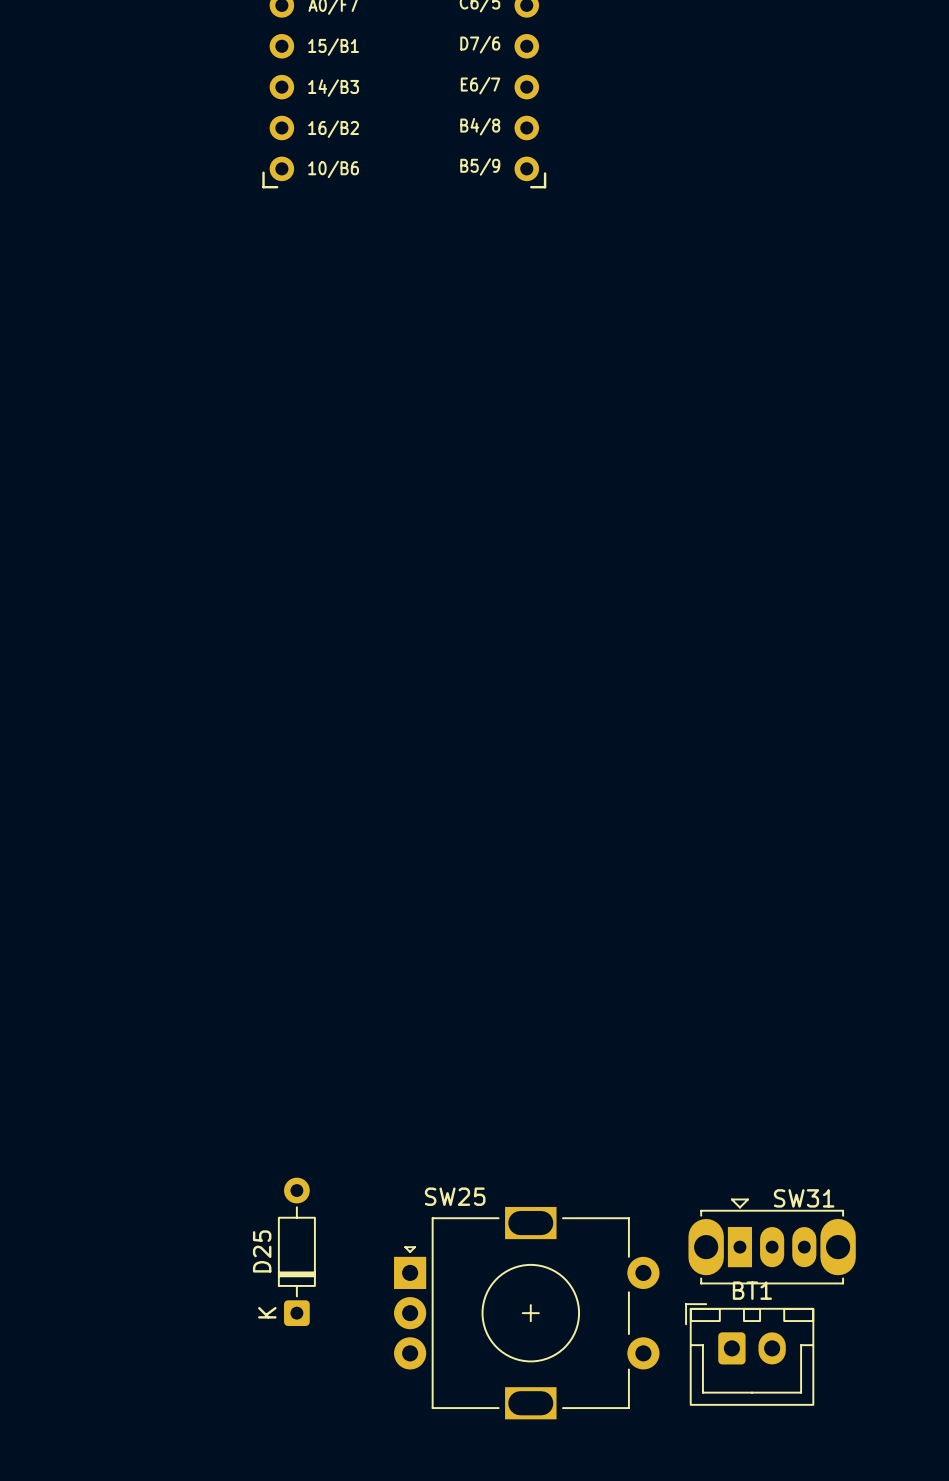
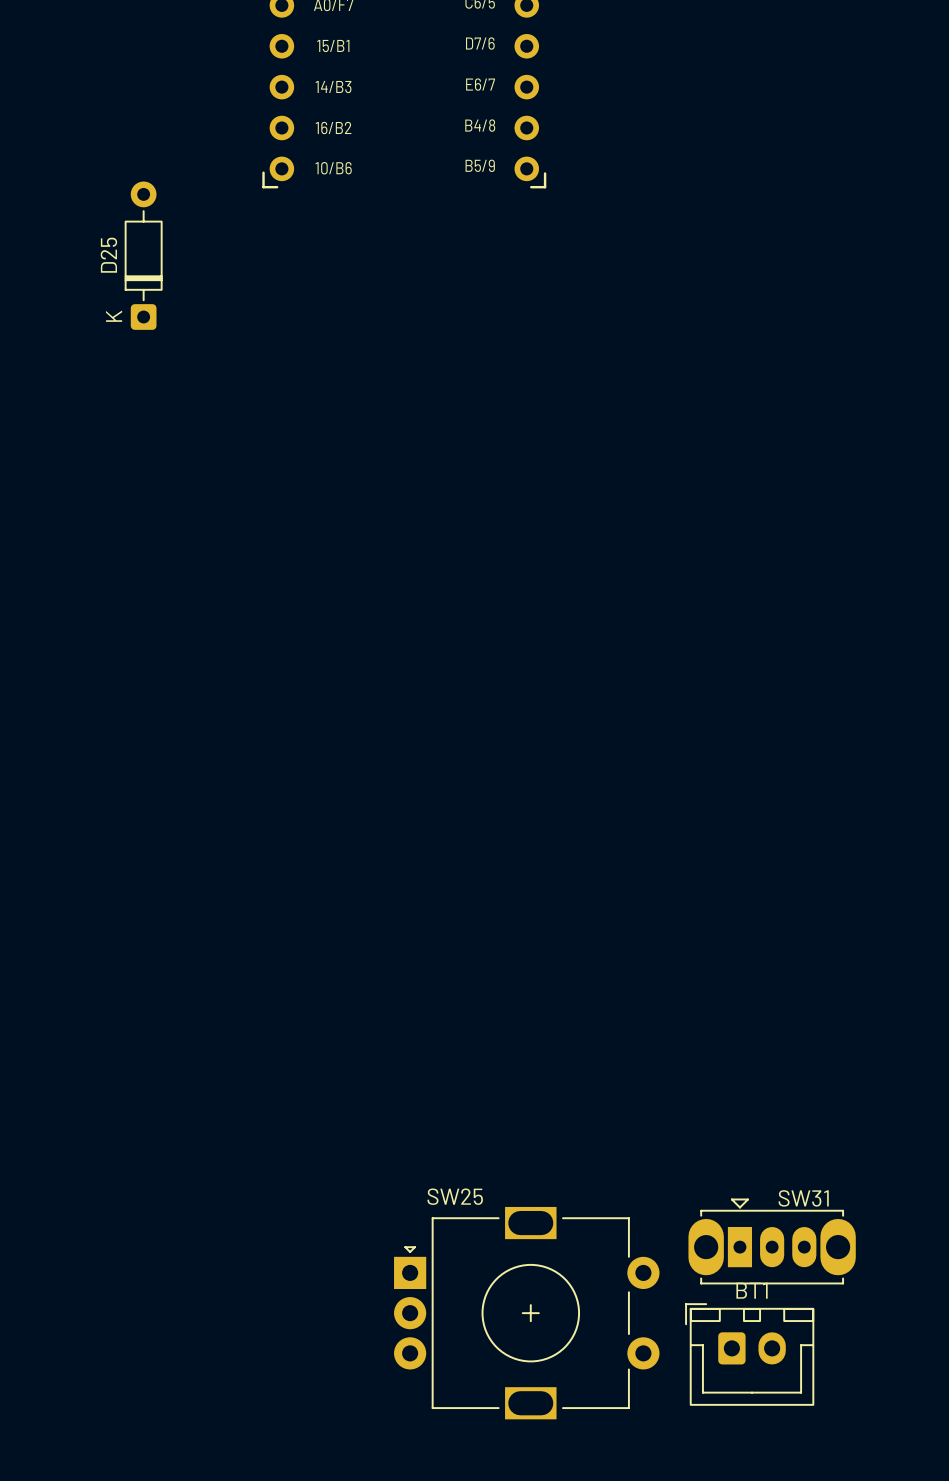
D25 position: (296, 1251) -> (143, 255)

